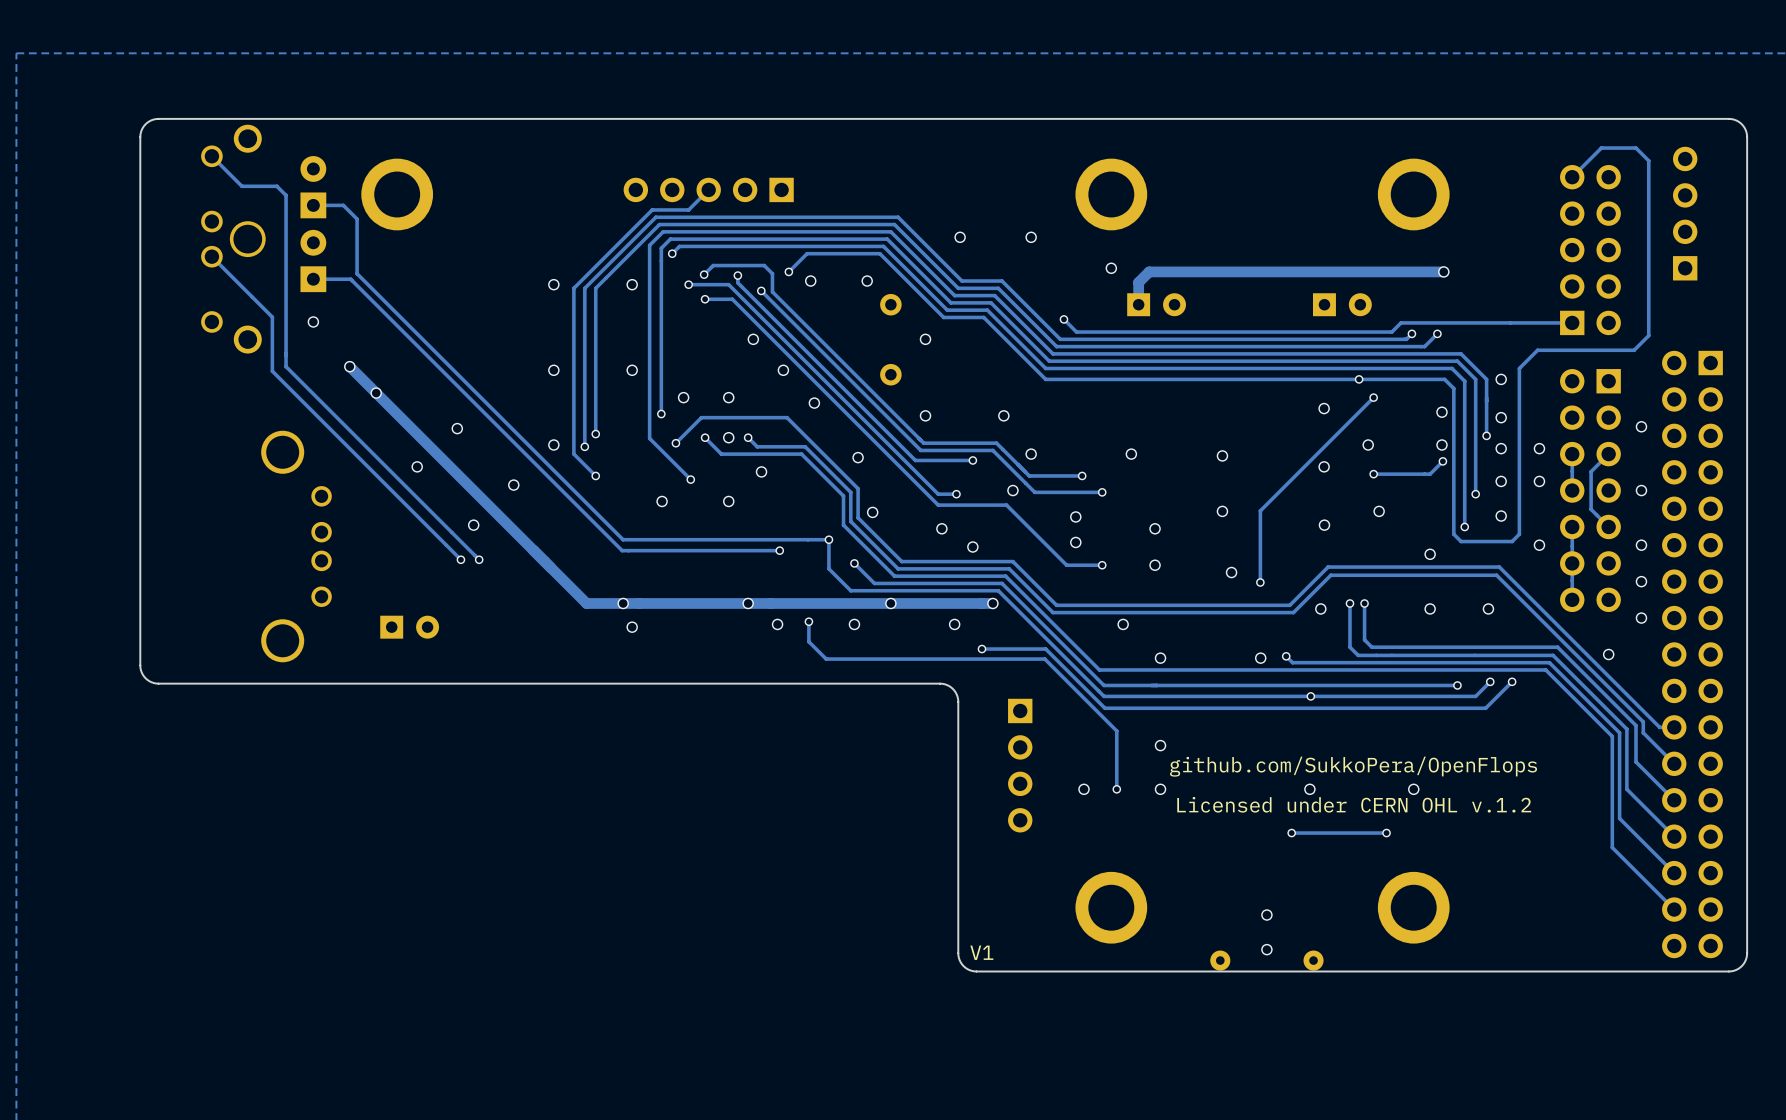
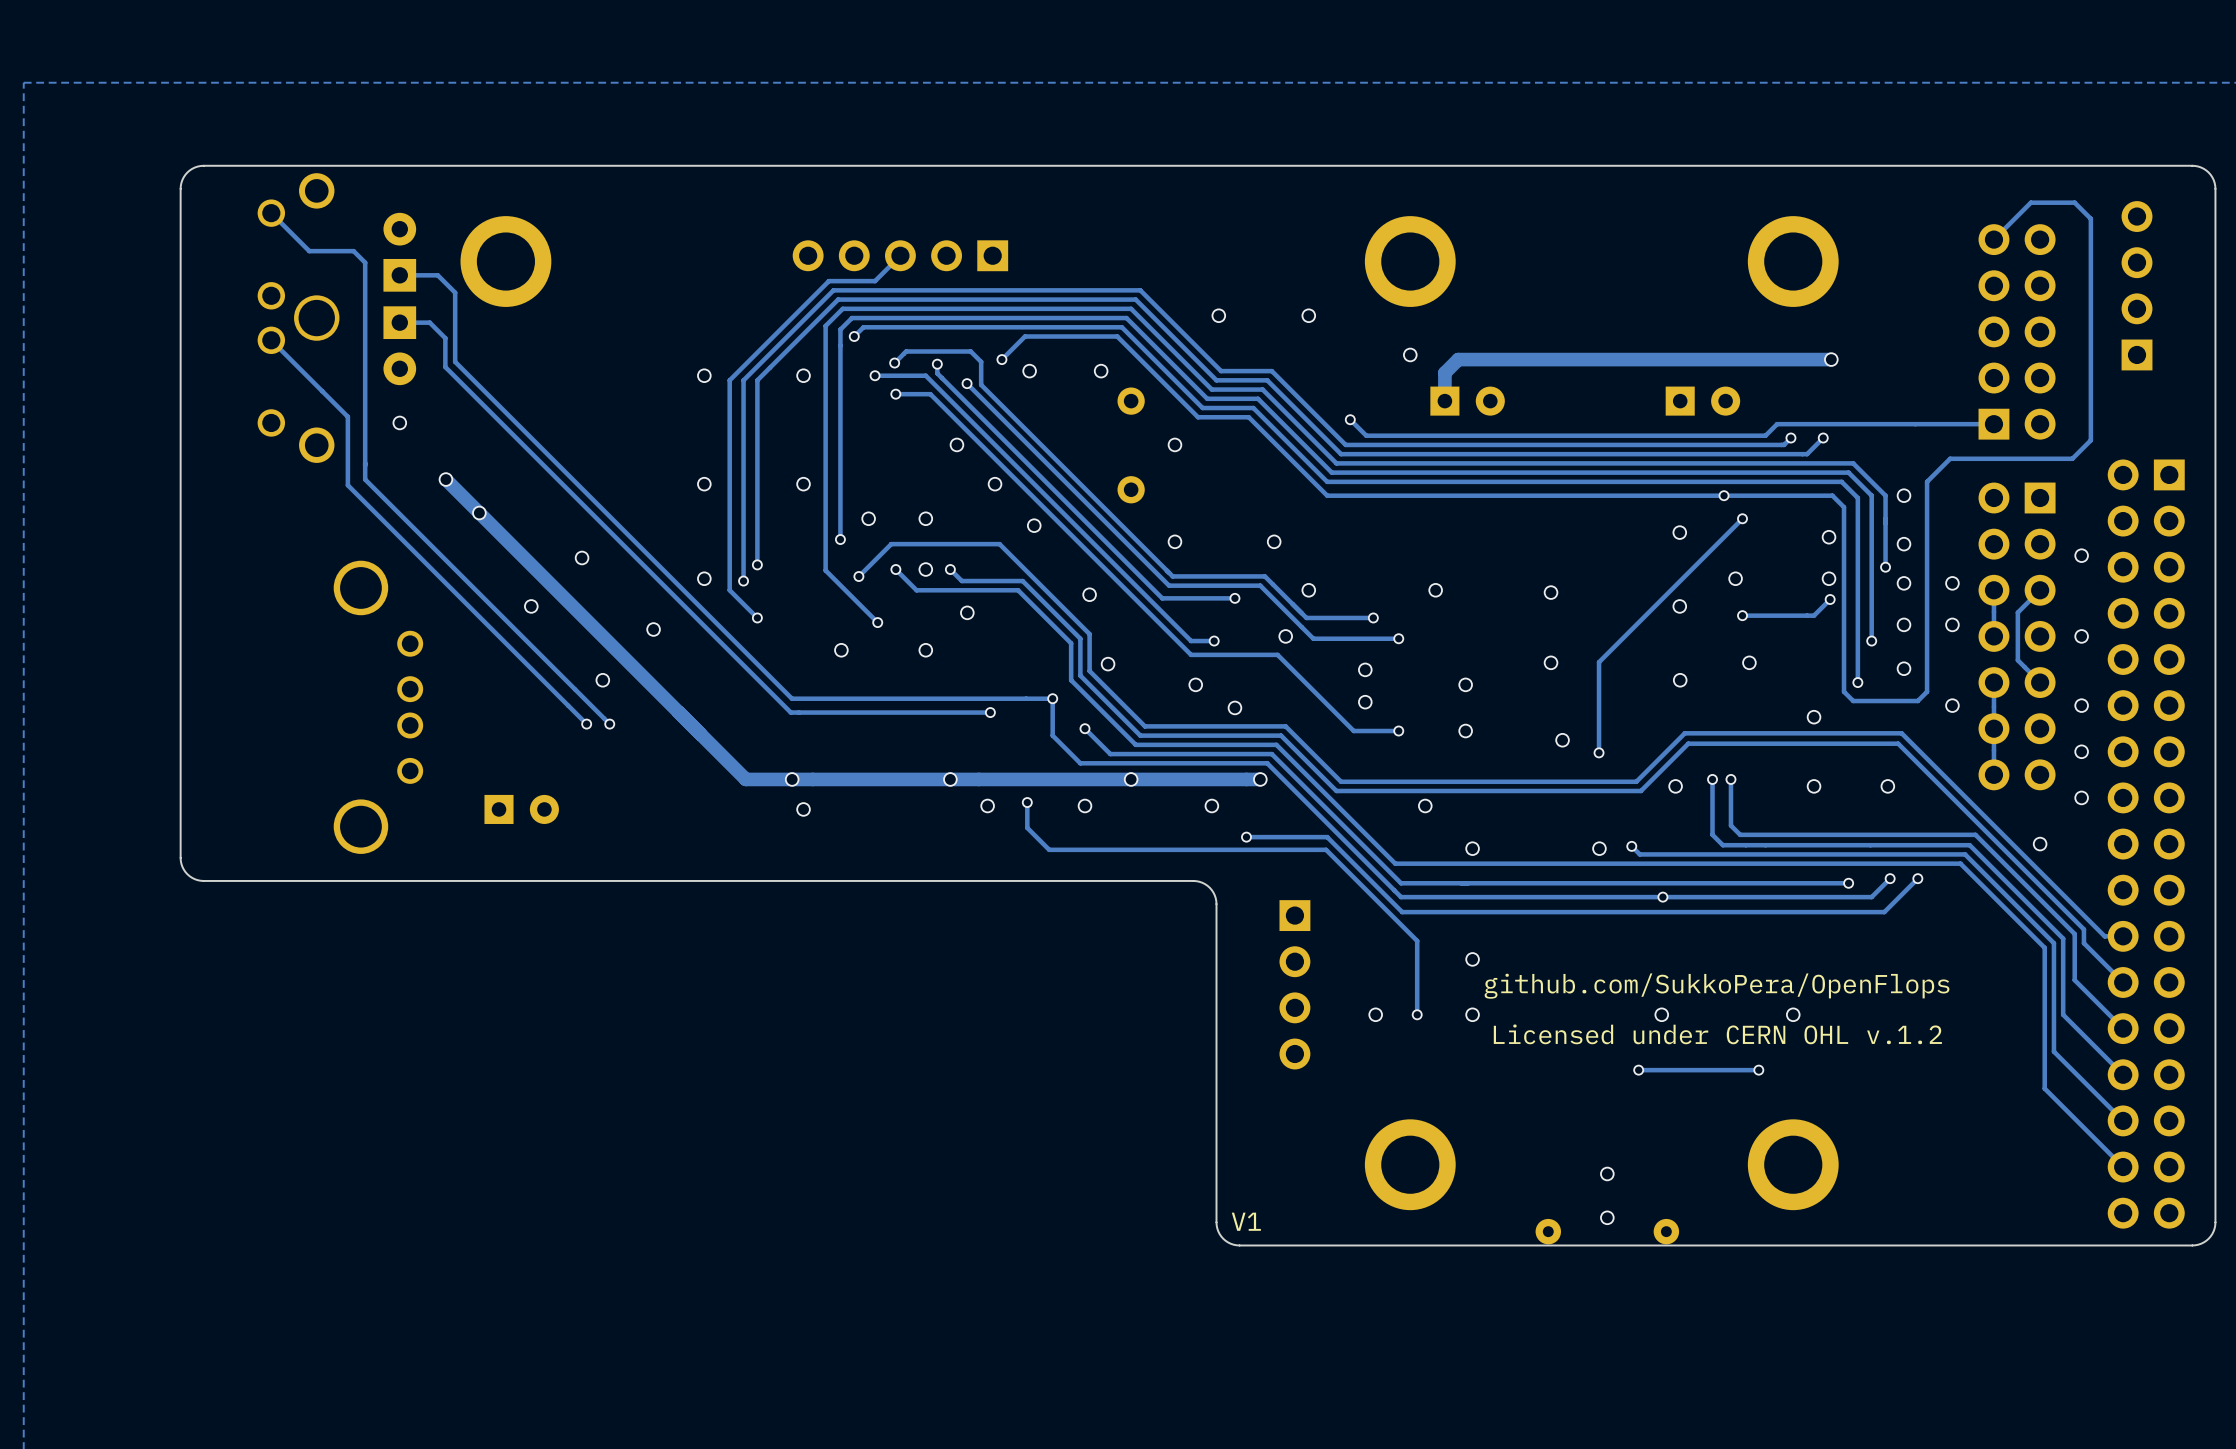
part rotation: 0° (313, 260) -> 180° (399, 345)
track: (350, 279) (313, 279) -> (447, 368) (445, 367) (445, 338) (429, 322) (399, 322)

